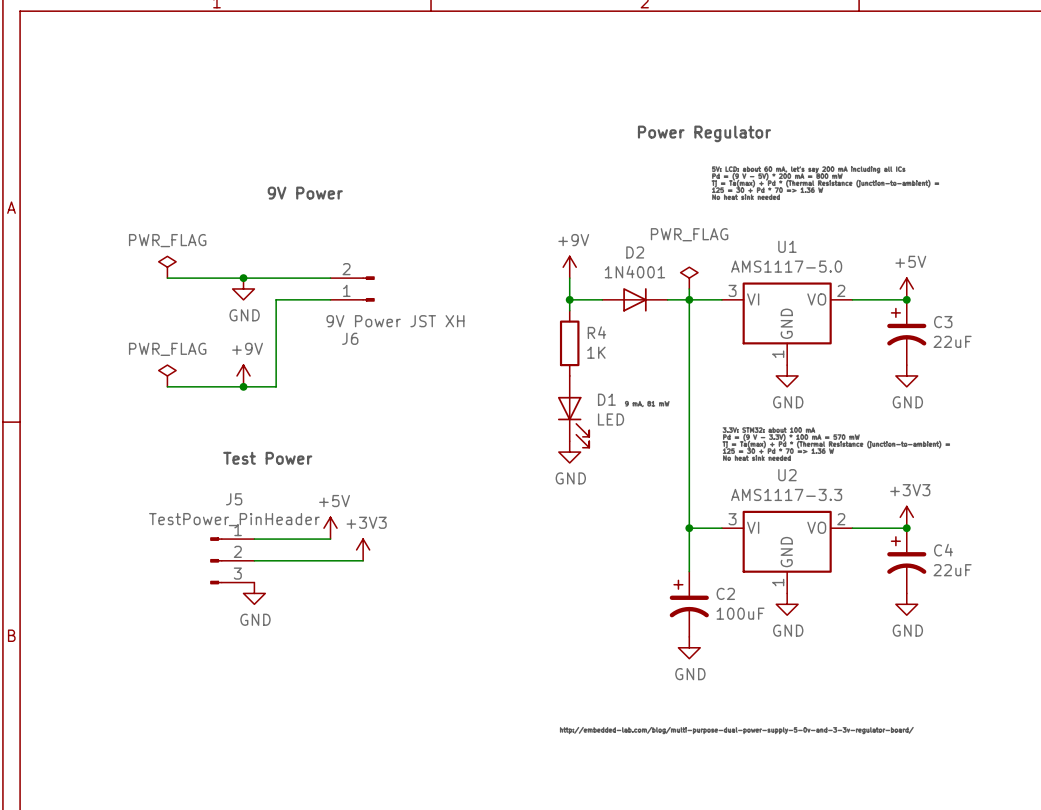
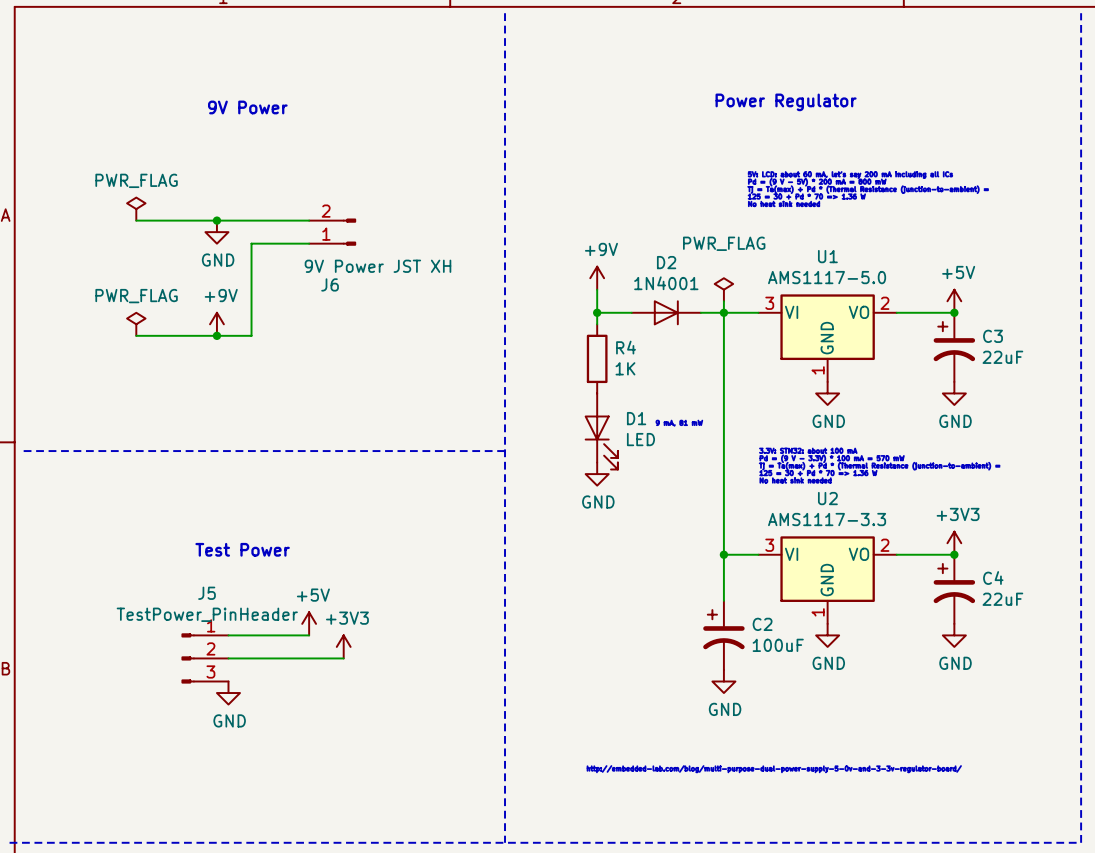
line: none -> (505, 13) (505, 842)
line: none -> (1081, 13) (1081, 842) (9, 842)
text position: Power Regulator (704, 133) -> Power Regulator (786, 102)
text position: 9V Power (305, 193) -> 9V Power (247, 107)
power symbol: none -> PWR_FLAG (136, 209)
junction: none -> (216, 220)
power symbol: PWR_FLAG (167, 267) -> none
wire: (167, 278) (330, 278) -> (136, 220) (309, 220)
junction: (243, 278) -> none
power symbol position: GND (243, 288) -> GND (216, 232)
J6 position: (352, 288) -> (332, 232)
wire: (330, 299) (276, 299) (276, 386) (167, 386) -> (309, 243) (251, 243) (251, 335) (136, 335)
power symbol: none -> PWR_FLAG (136, 324)
junction: none -> (216, 335)
power symbol: PWR_FLAG (167, 375) -> none
power symbol position: +9V (243, 375) -> +9V (216, 324)
junction: (243, 386) -> none
line: none -> (21, 451) (505, 451)
text position: Test Power (267, 458) -> Test Power (242, 549)
power symbol position: +5V (330, 528) -> +5V (309, 623)
wire: (254, 539) (330, 539) -> (228, 635) (309, 635)
power symbol position: +3V3 (363, 549) -> +3V3 (343, 646)
J5 position: (232, 560) -> (205, 658)
wire: (254, 560) (363, 560) -> (228, 658) (343, 658)
power symbol position: GND (254, 593) -> GND (228, 693)

